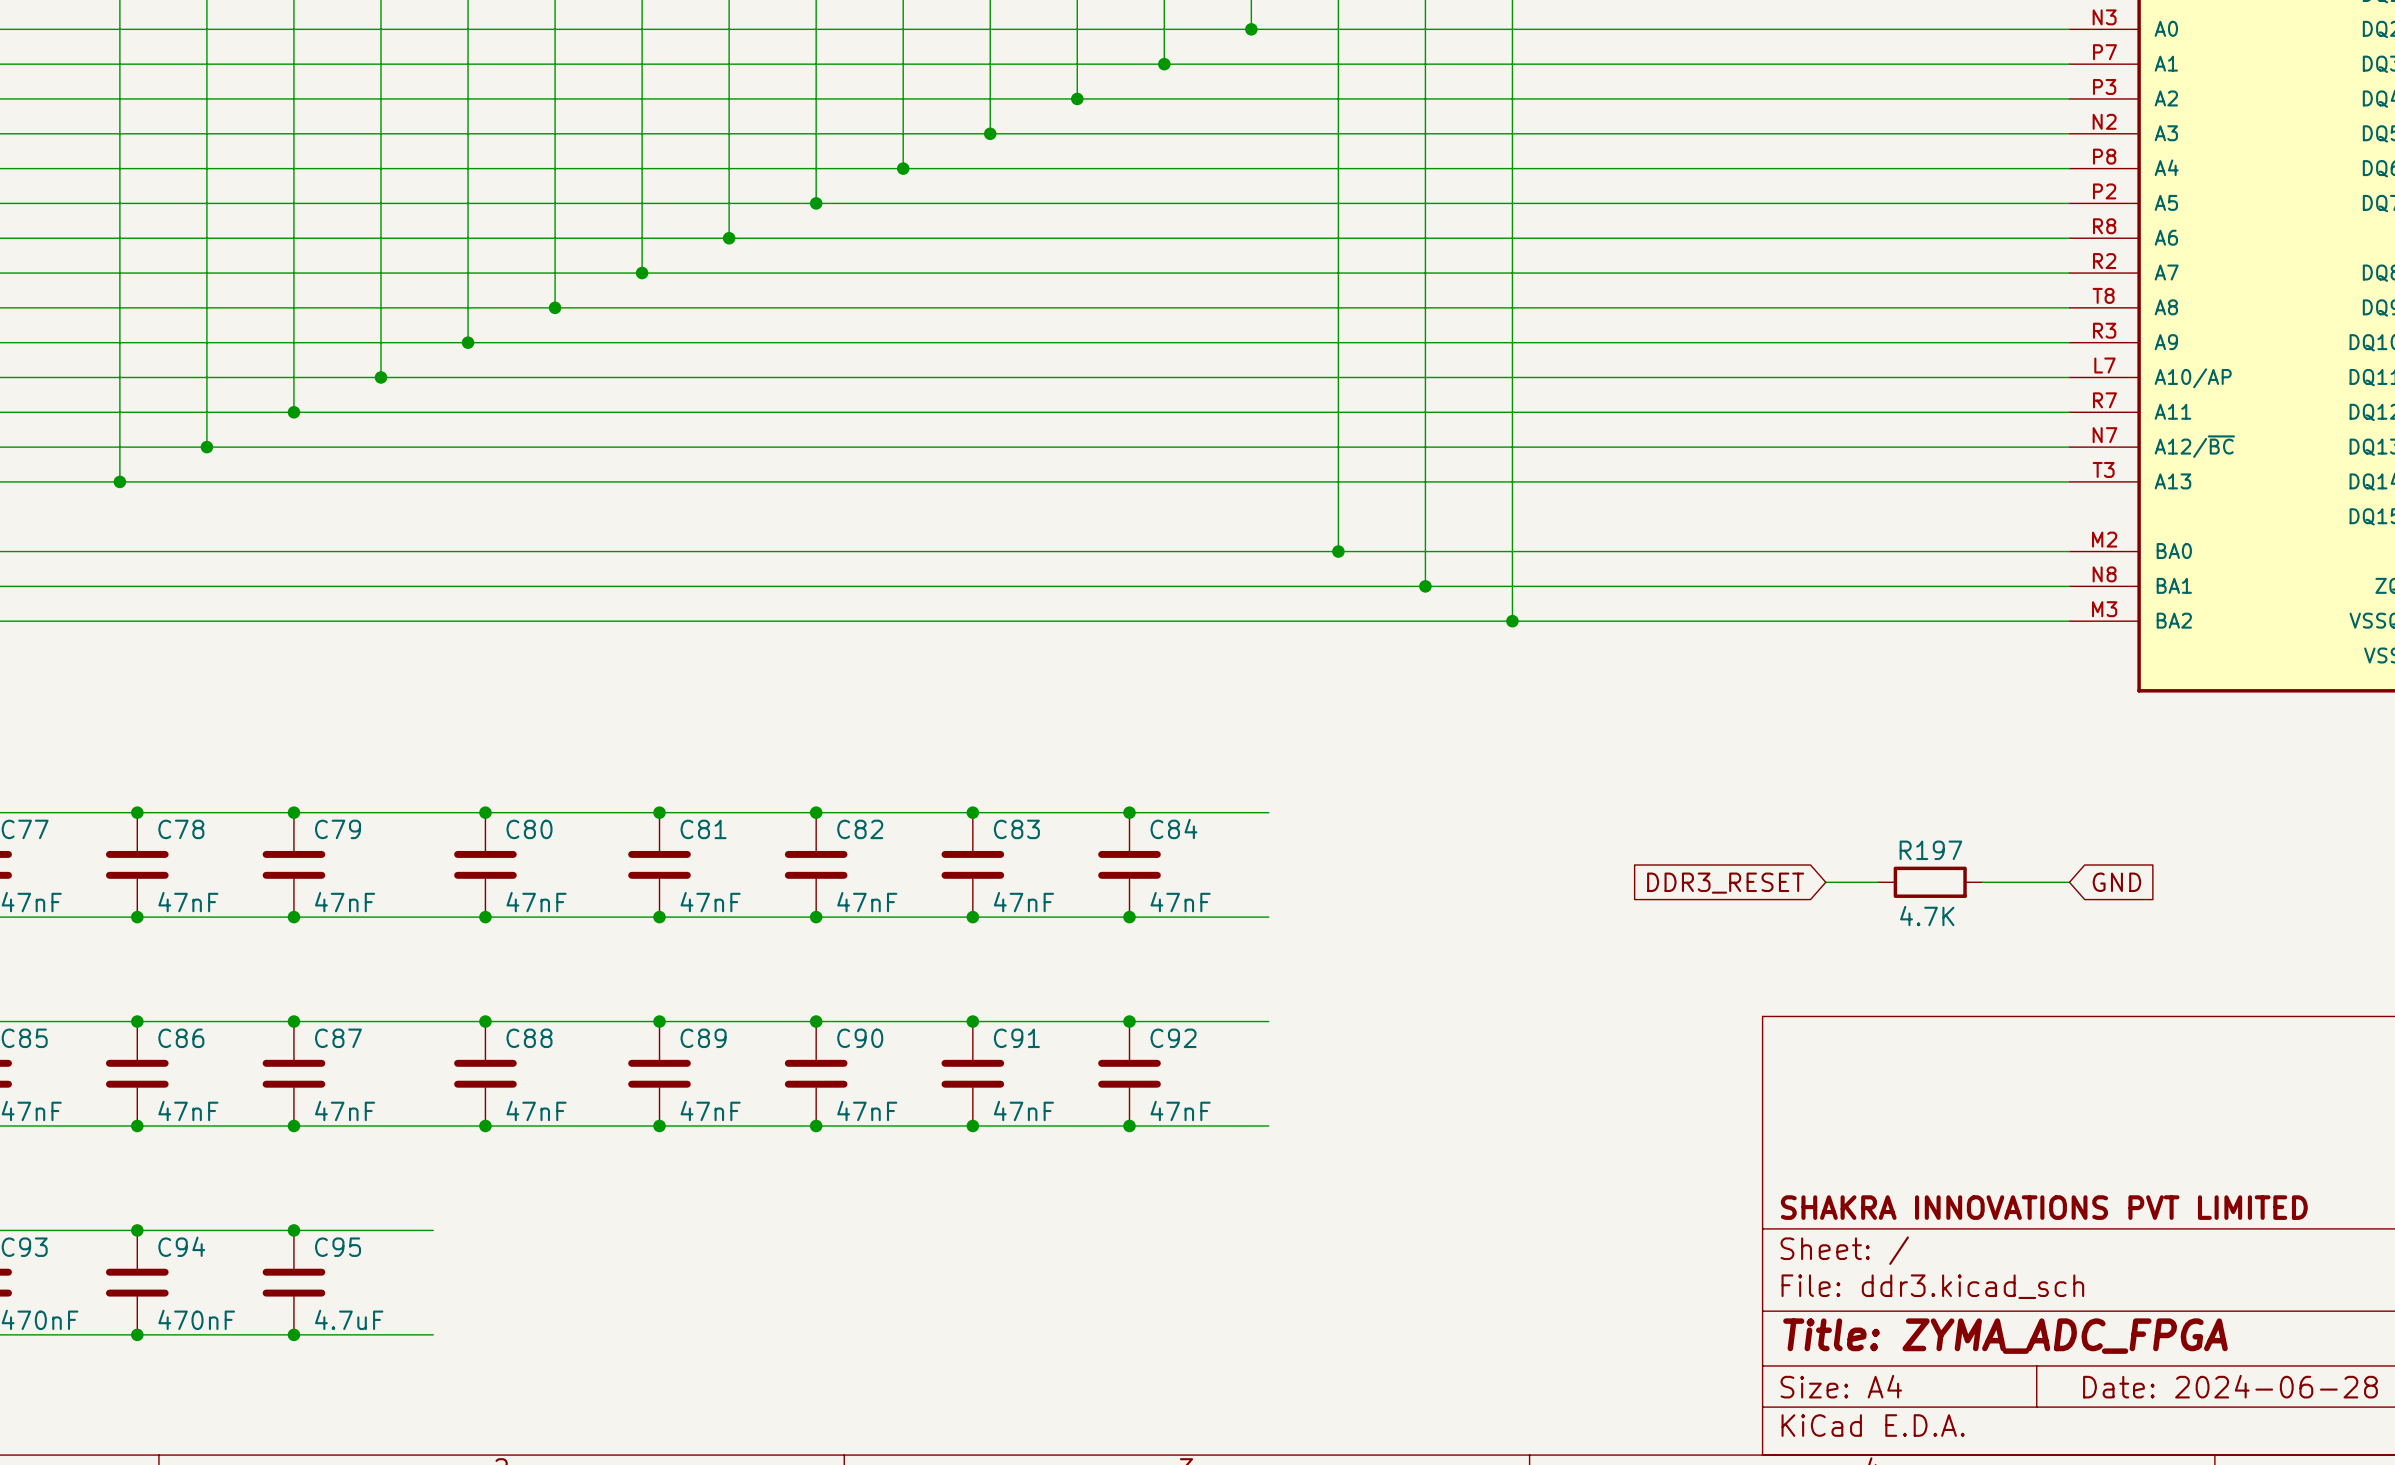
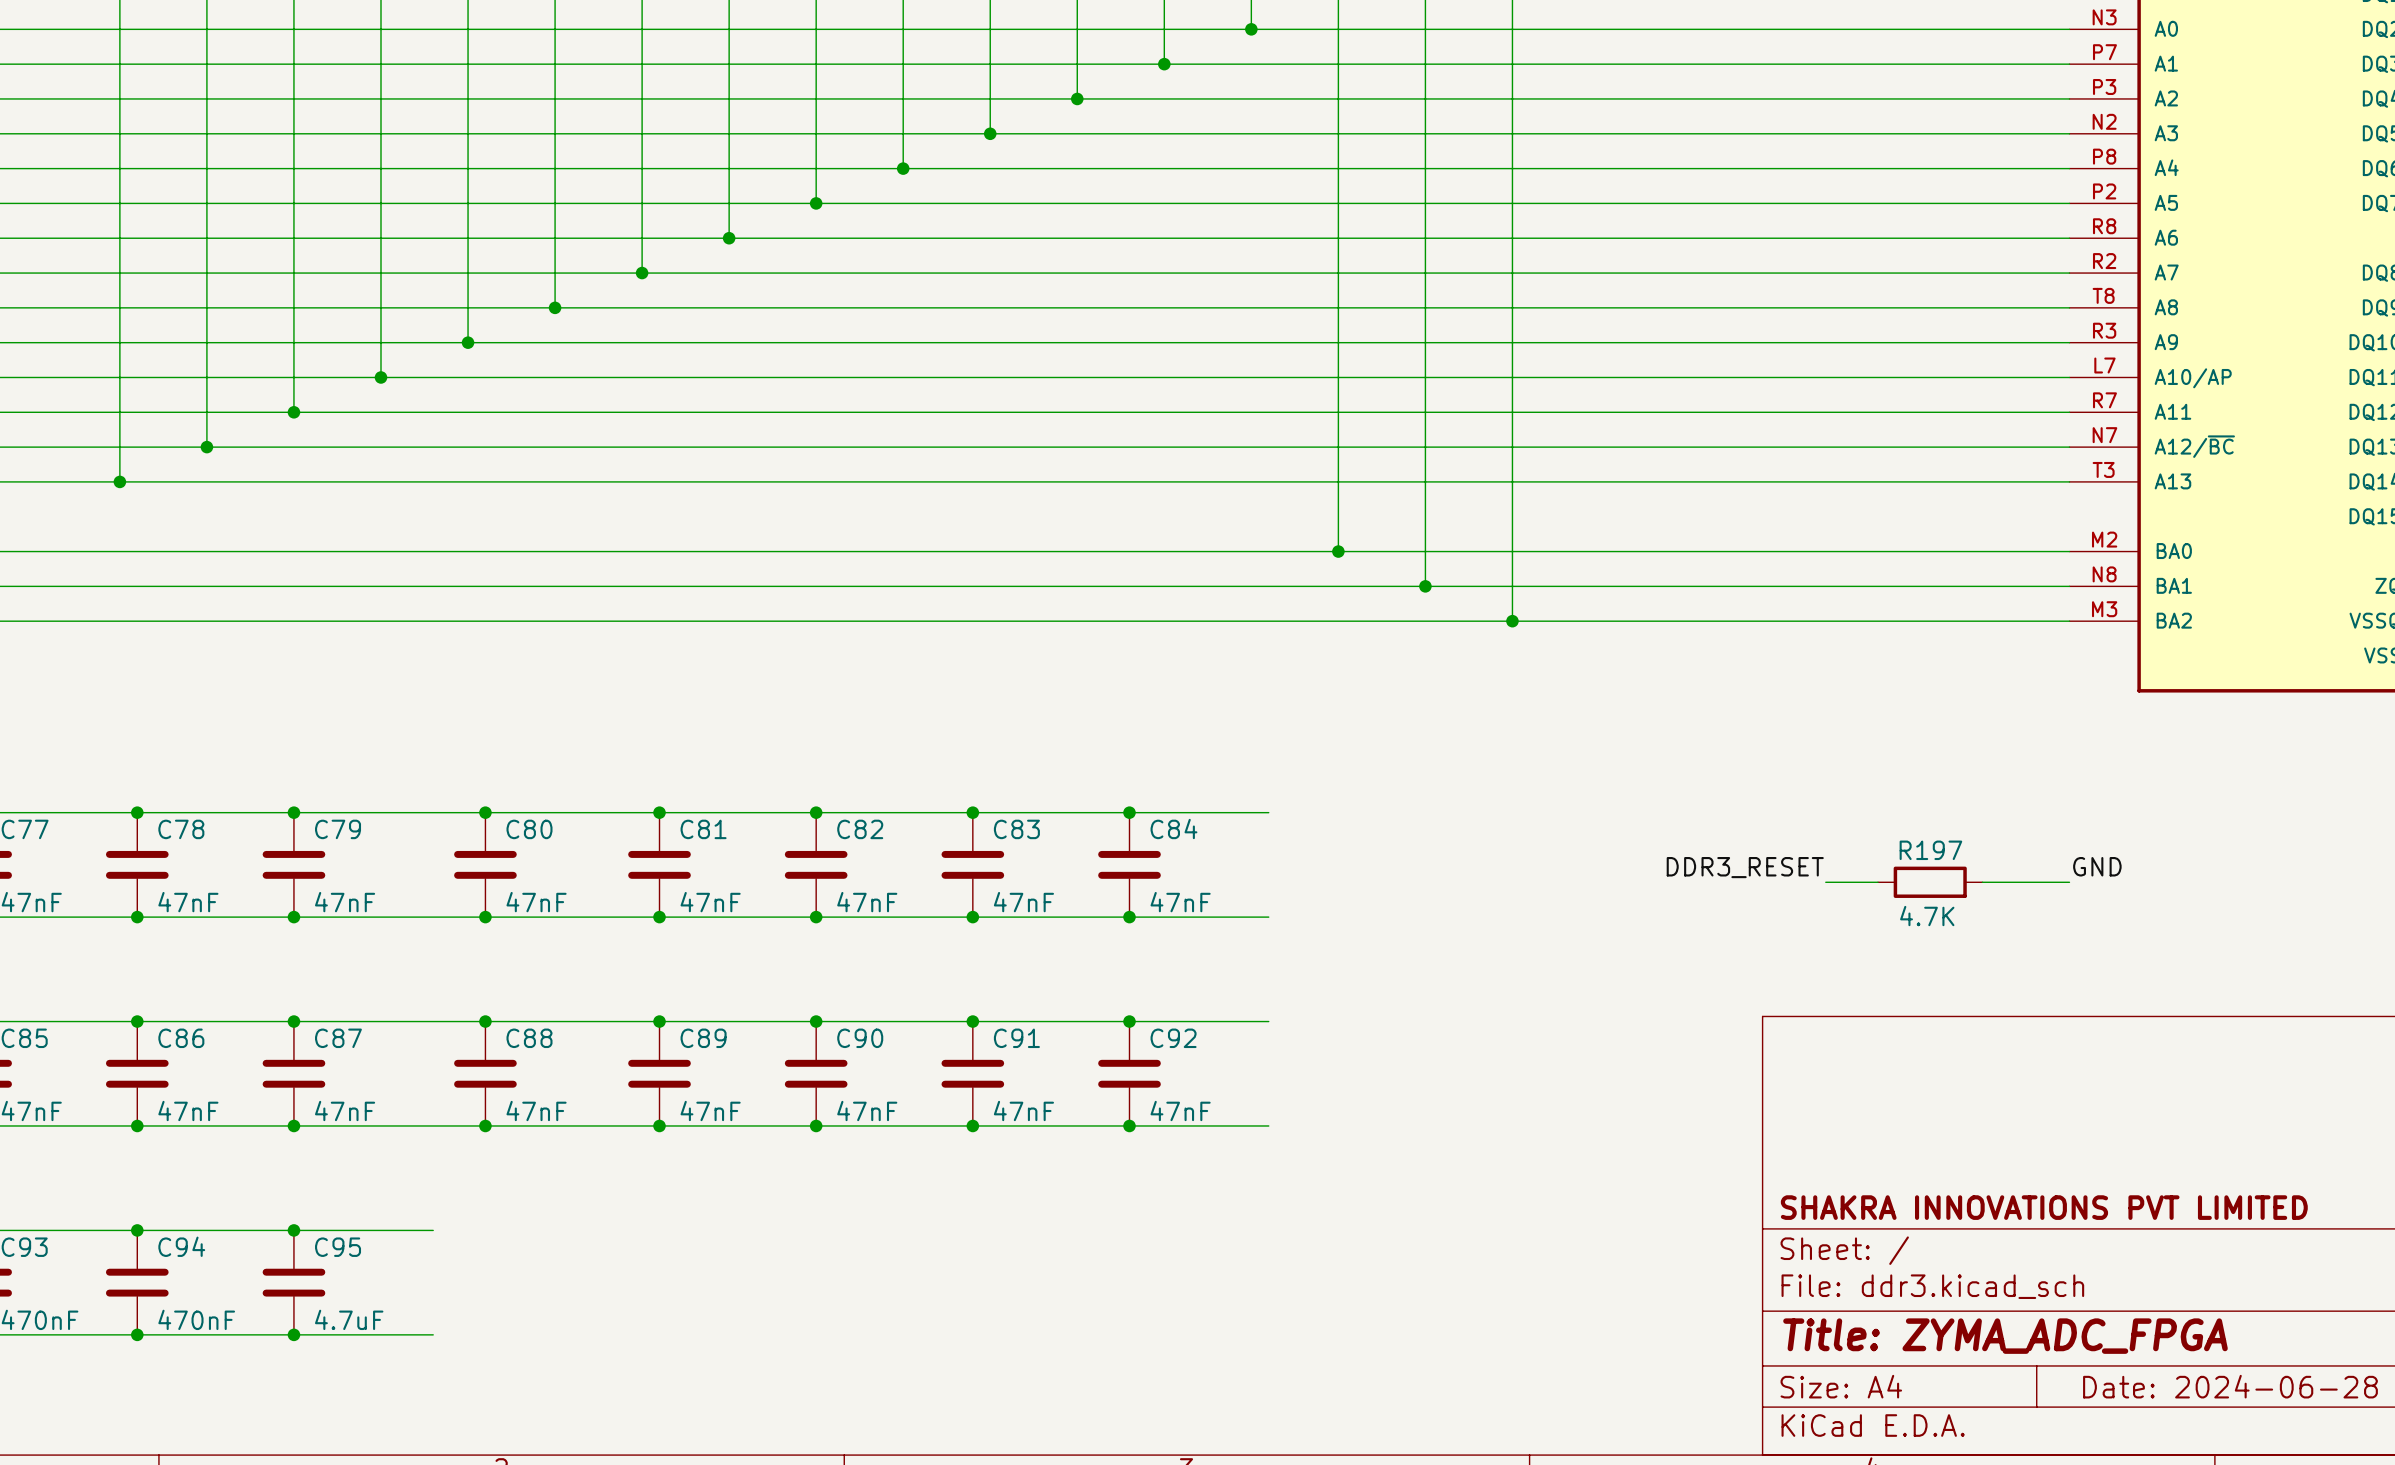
label: none -> GND (2097, 866)
label: none -> DDR3_RESET (1745, 867)
global label: GND (2116, 882) -> none
global label: DDR3_RESET (1725, 883) -> none

